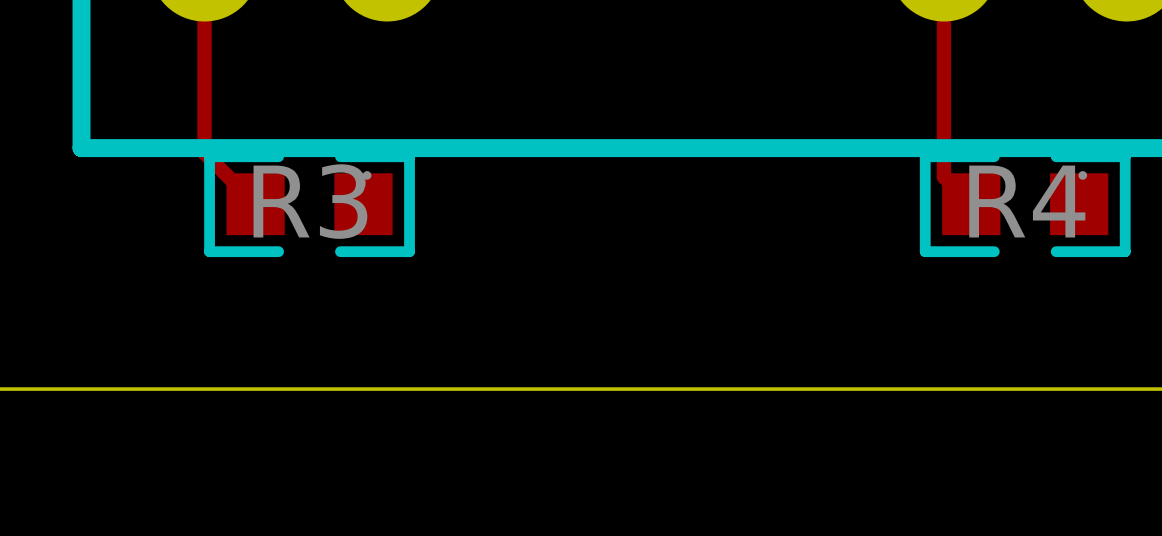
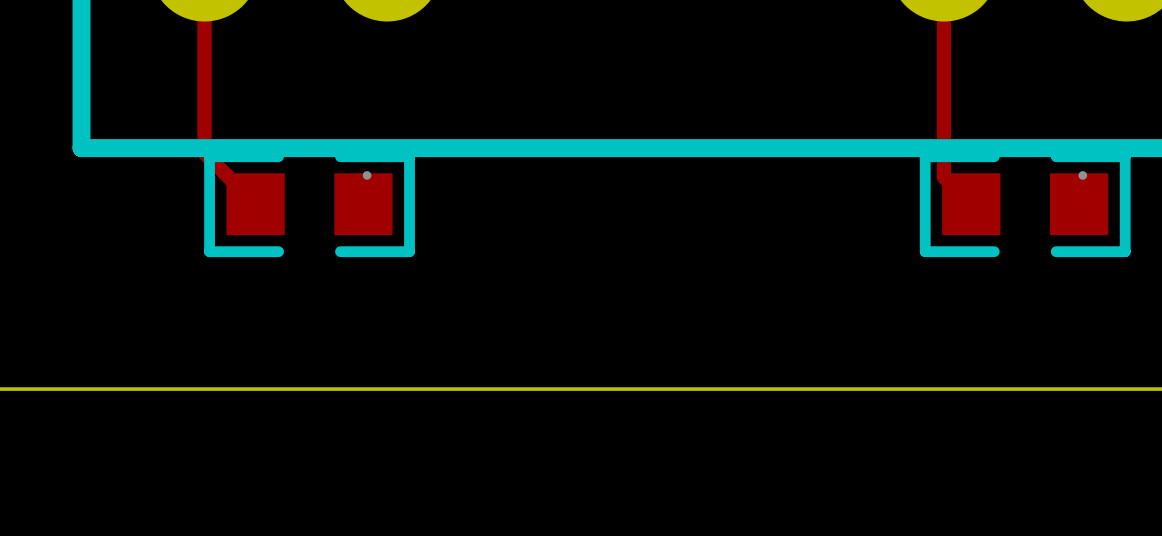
R3 name: R3 (310, 201) -> none
R4 name: R4 (1027, 201) -> none

